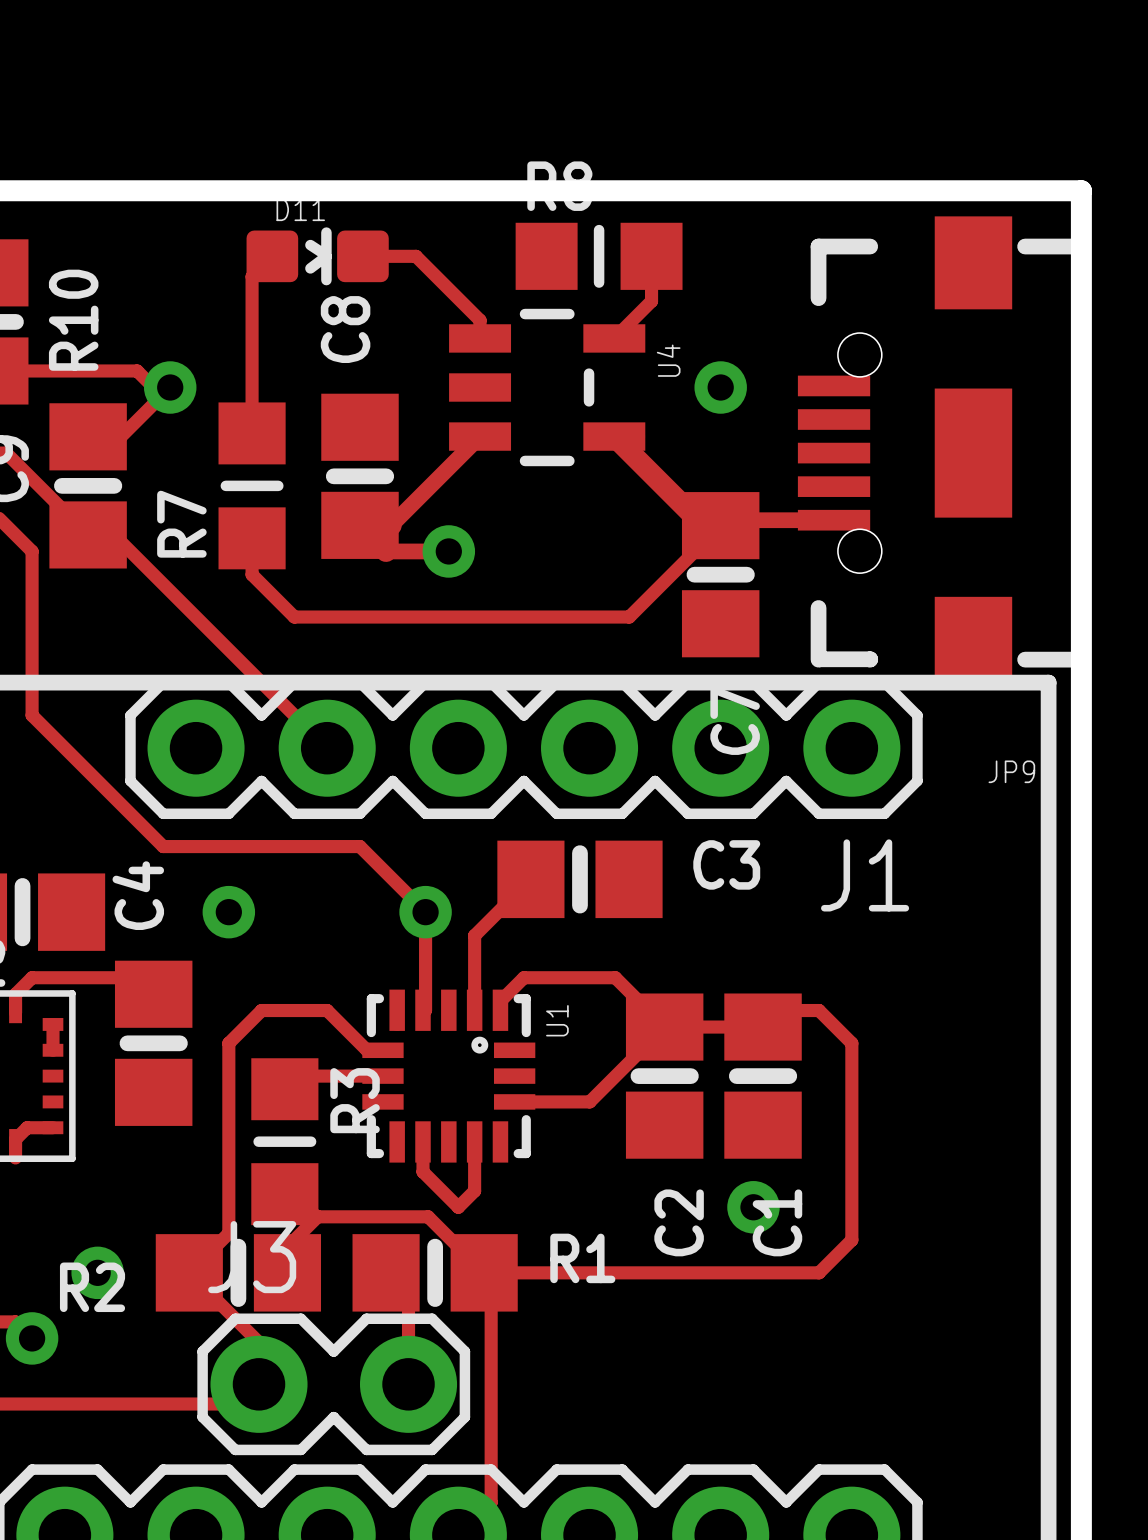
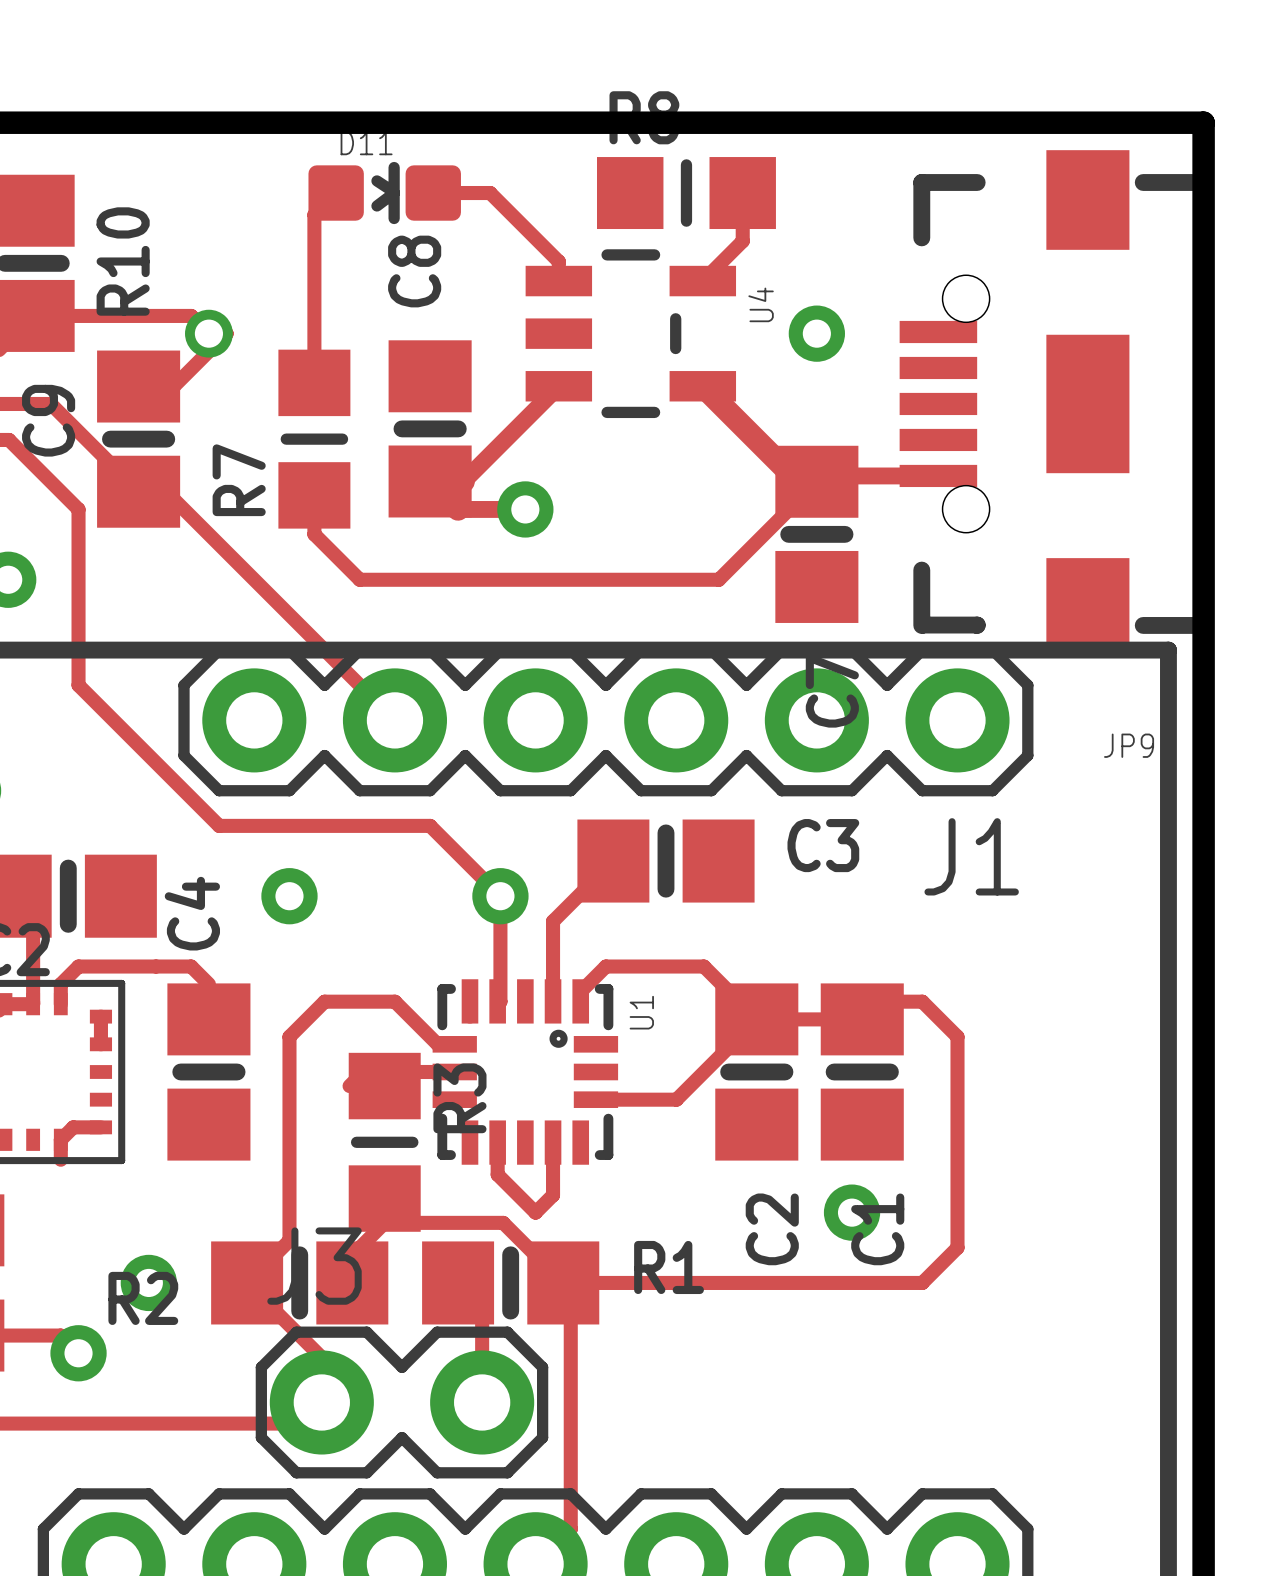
via position: (170, 387) -> (208, 333)
C4 position: (153, 1043) -> (208, 1071)
R3 position: (284, 1141) -> (384, 1142)

